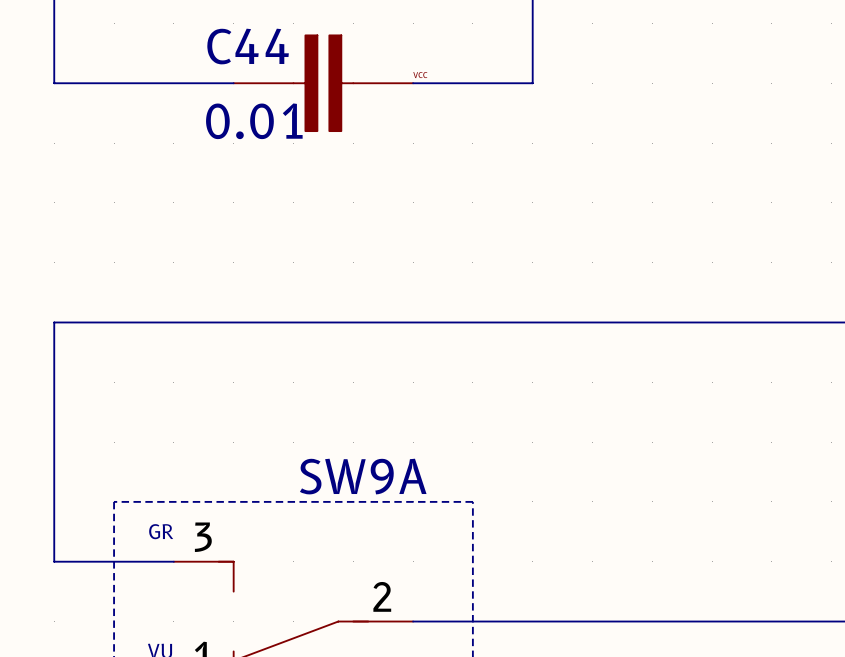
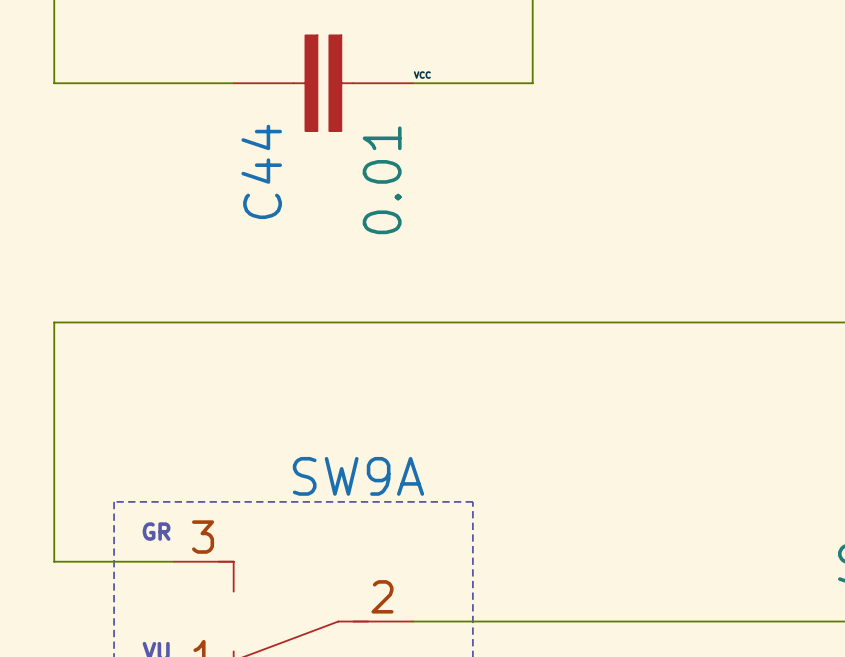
C44 name rotation: 0° (248, 46) -> 90° counterclockwise (261, 171)
C44 name position: C44 (248, 46) -> C44 (261, 171)
C44 value rotation: 0° (254, 121) -> 90° counterclockwise (382, 180)
C44 value position: 0.01 (254, 121) -> 0.01 (382, 180)

